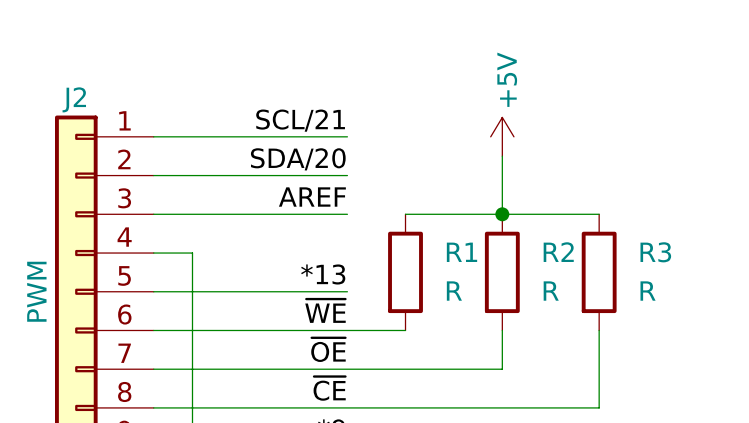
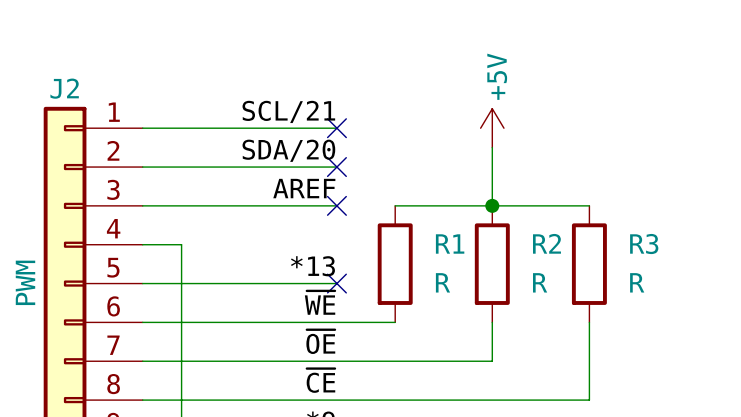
no-connect mark: none -> (336, 128)
no-connect mark: none -> (336, 167)
no-connect mark: none -> (336, 205)
no-connect mark: none -> (336, 283)

